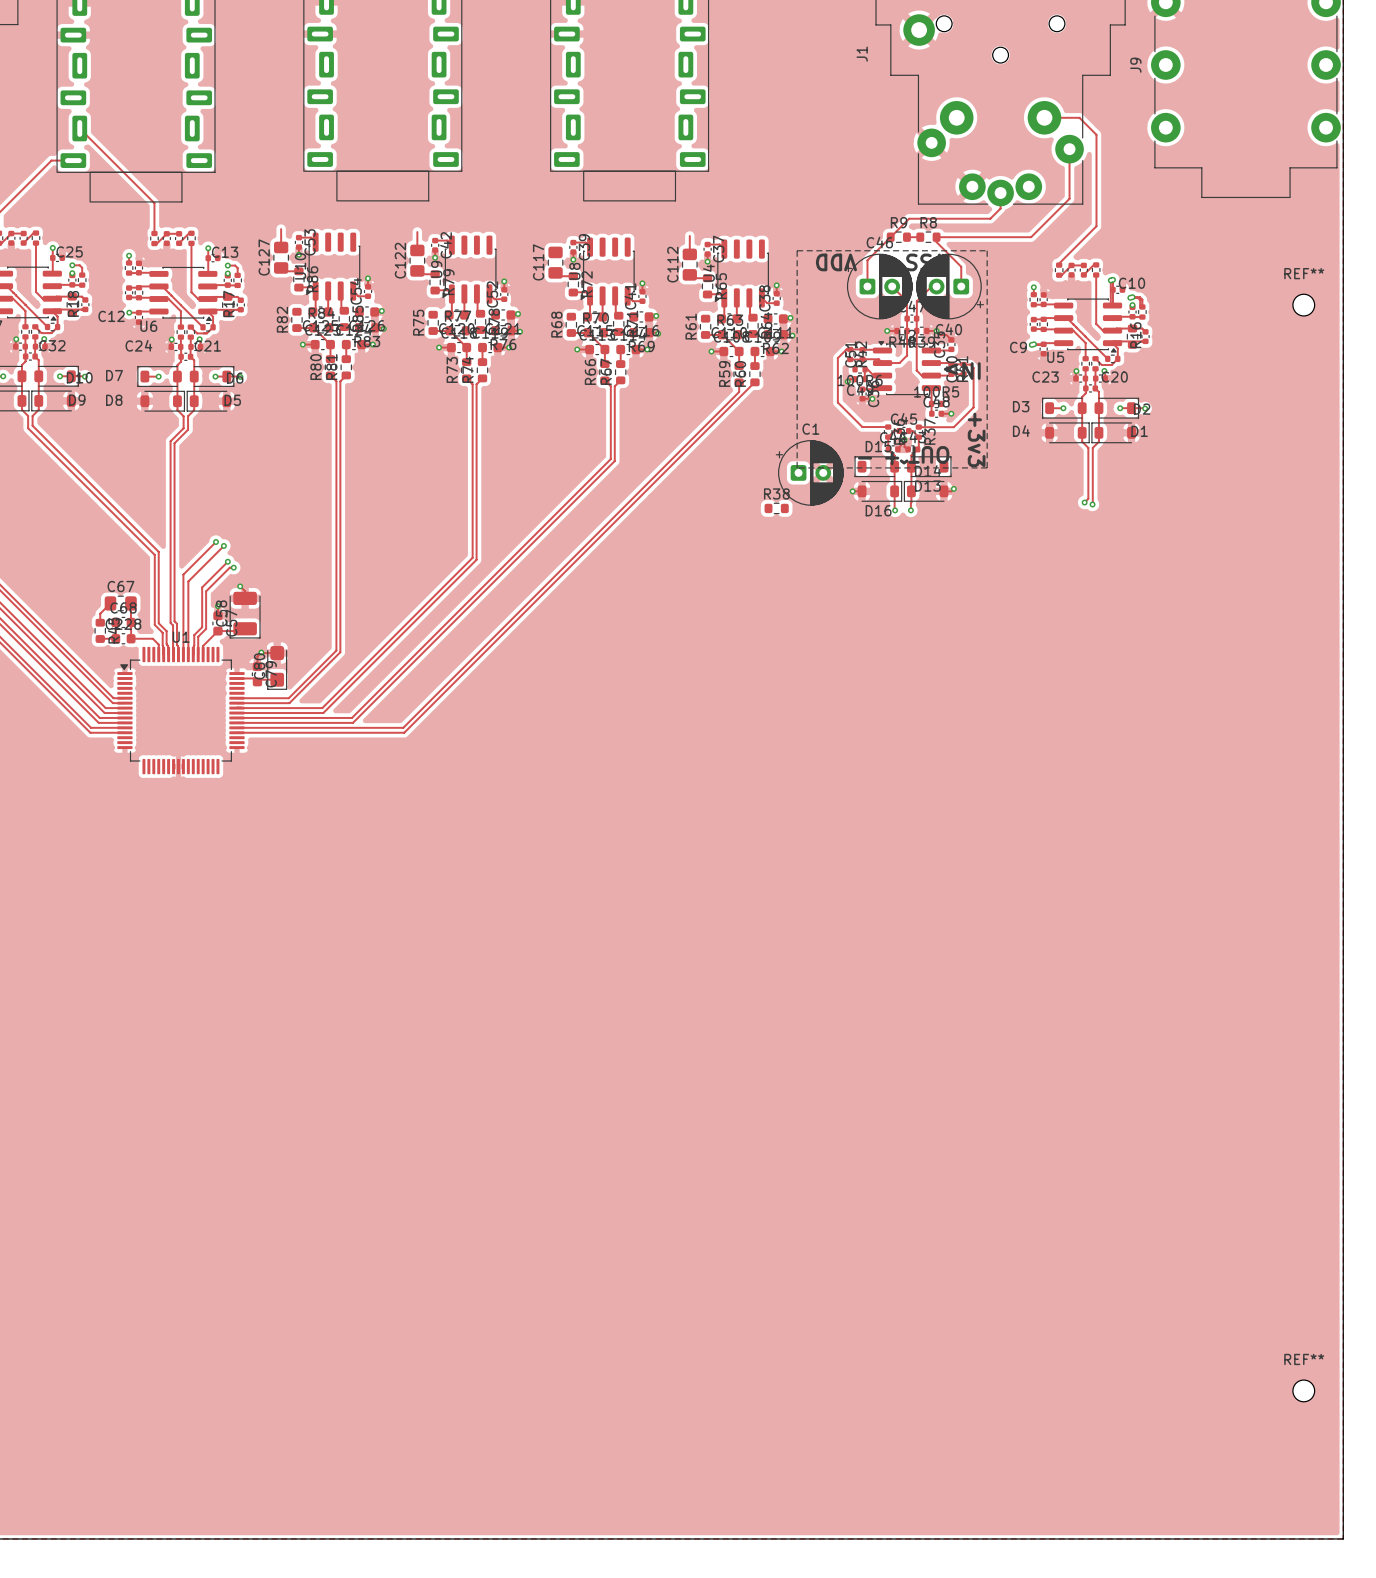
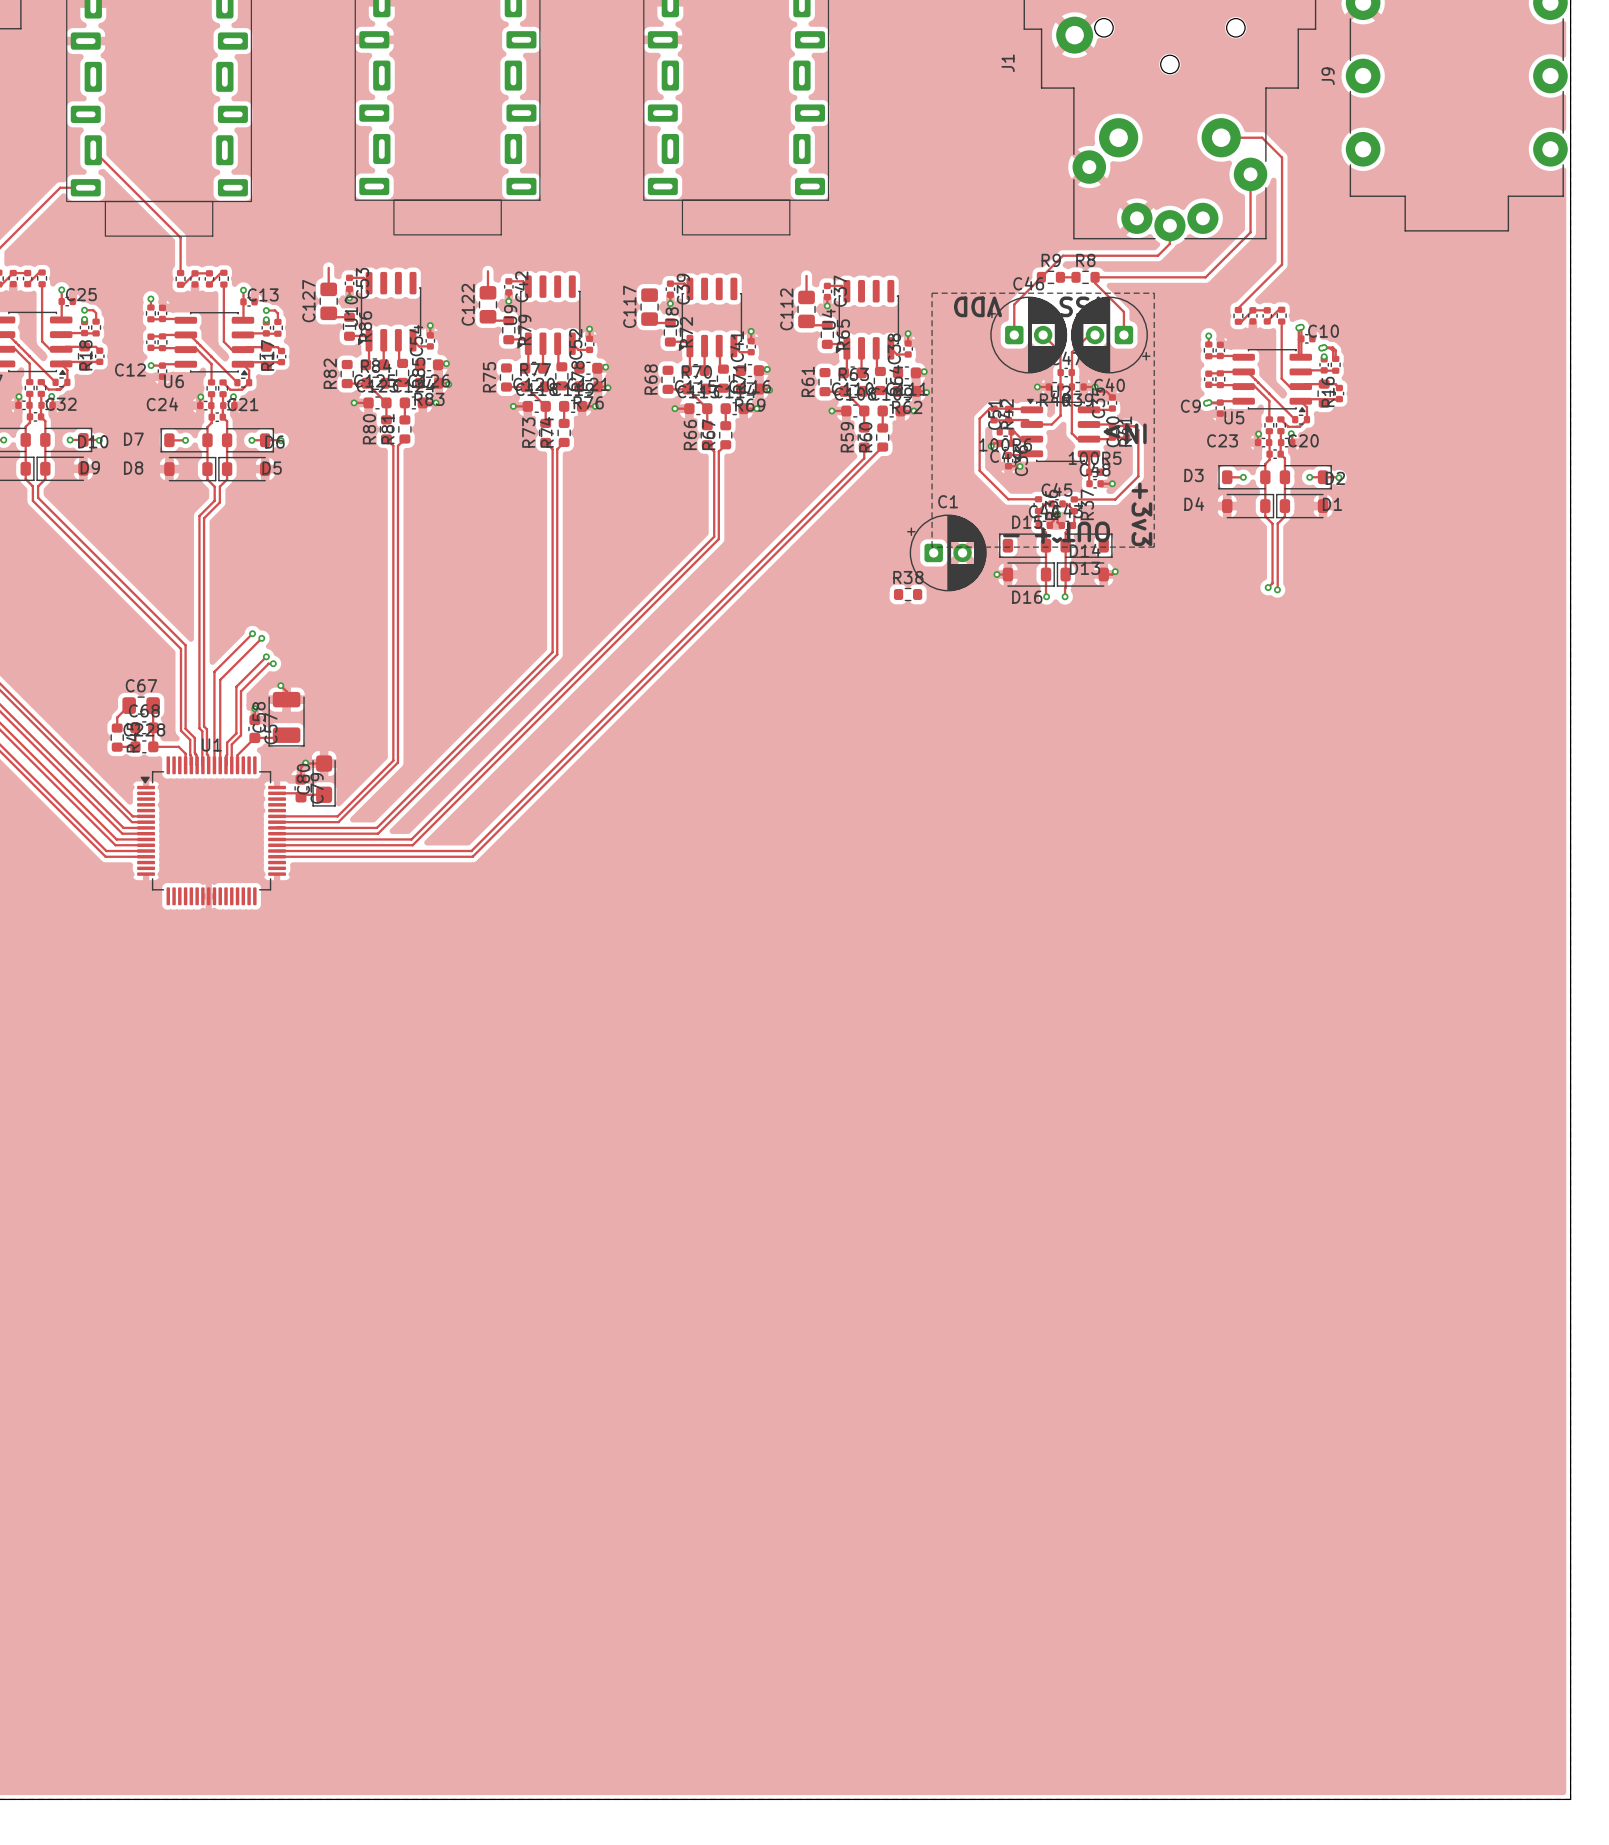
REF**: (1303, 305) -> none
REF**: (1303, 1390) -> none

